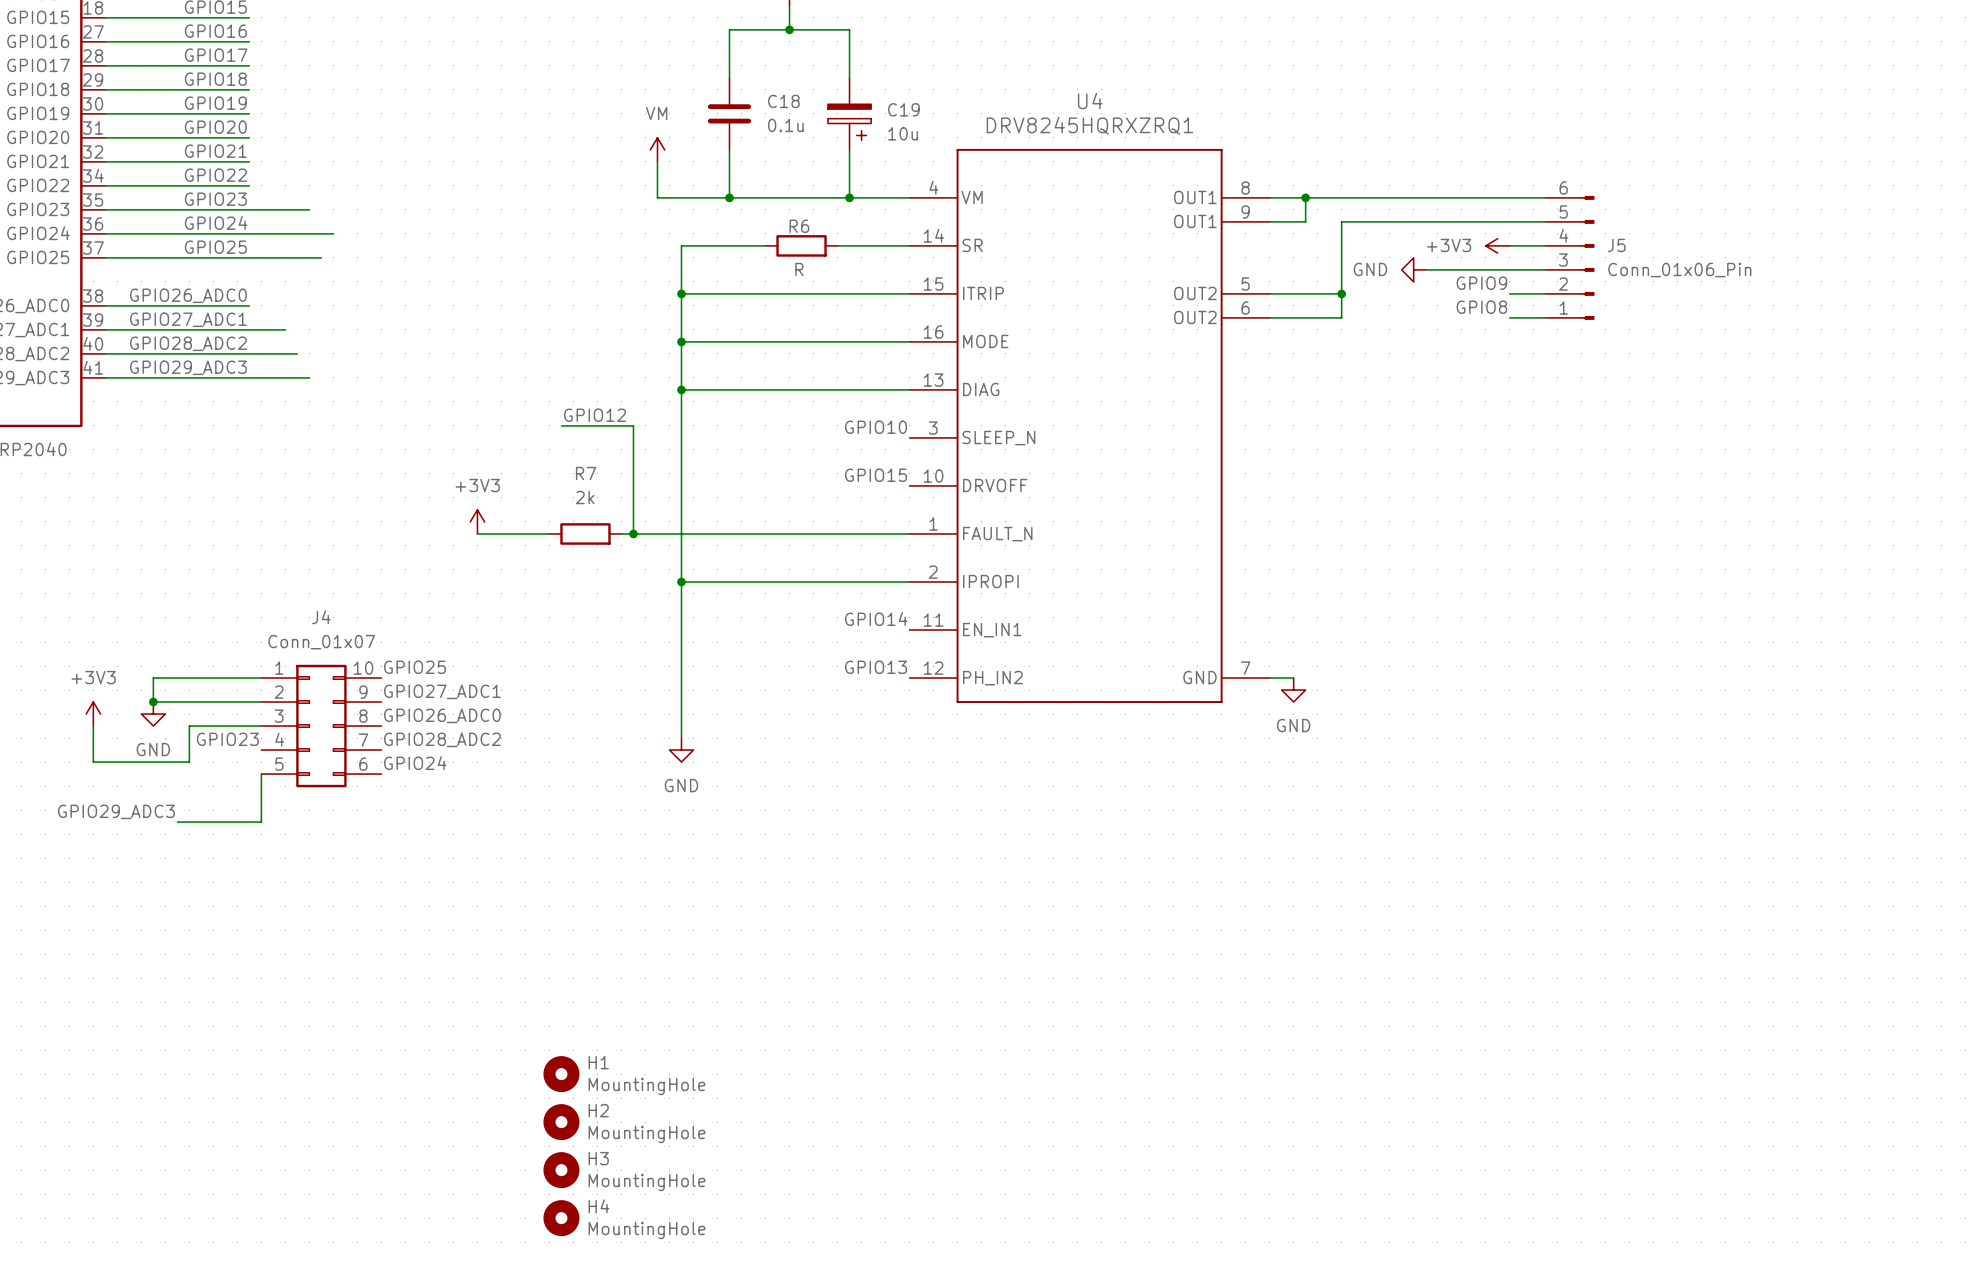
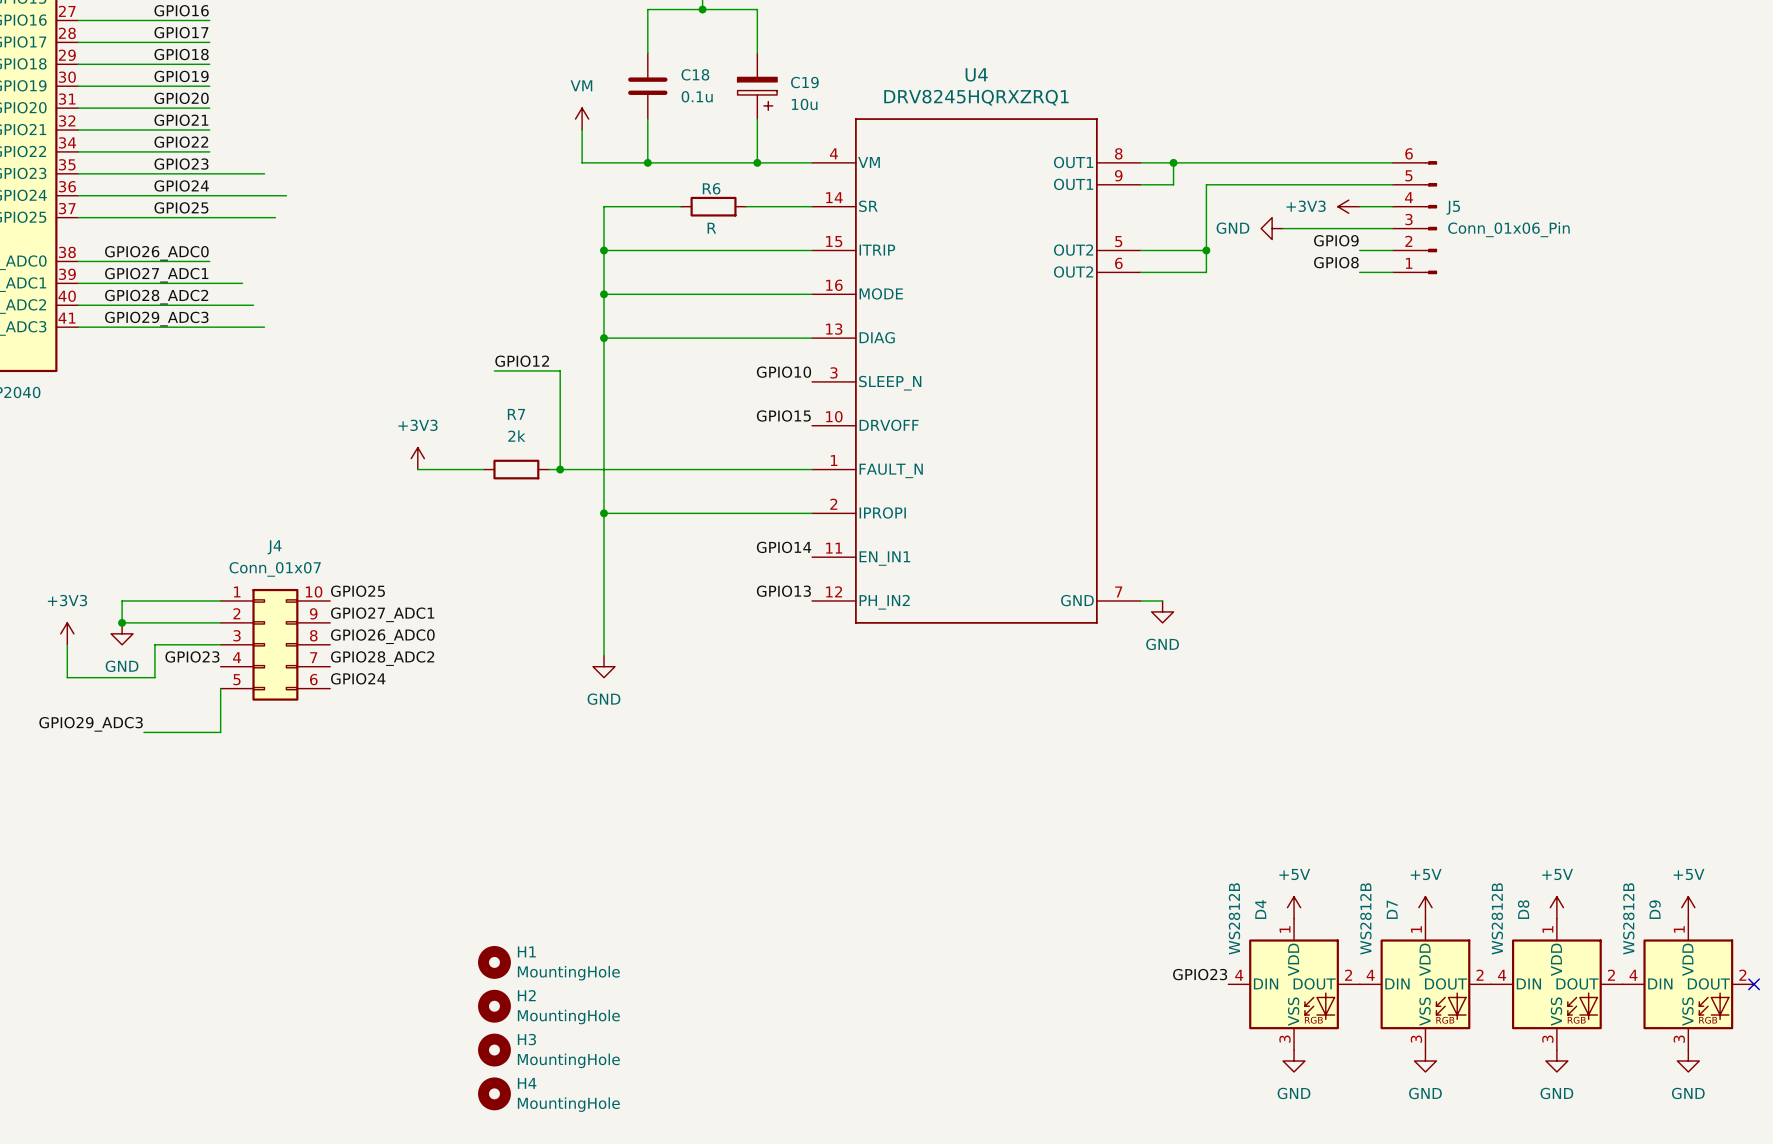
power symbol: none -> +5V (1294, 907)
power symbol: none -> +5V (1425, 907)
power symbol: none -> +5V (1556, 907)
power symbol: none -> +5V (1688, 907)
label: none -> GPIO23 (1200, 974)
D4: none -> WS2812B (1294, 984)
D7: none -> WS2812B (1425, 984)
D8: none -> WS2812B (1556, 984)
D9: none -> WS2812B (1688, 984)
no-connect mark: none -> (1754, 984)
power symbol: none -> GND (1294, 1061)
power symbol: none -> GND (1425, 1061)
power symbol: none -> GND (1556, 1061)
power symbol: none -> GND (1688, 1061)

